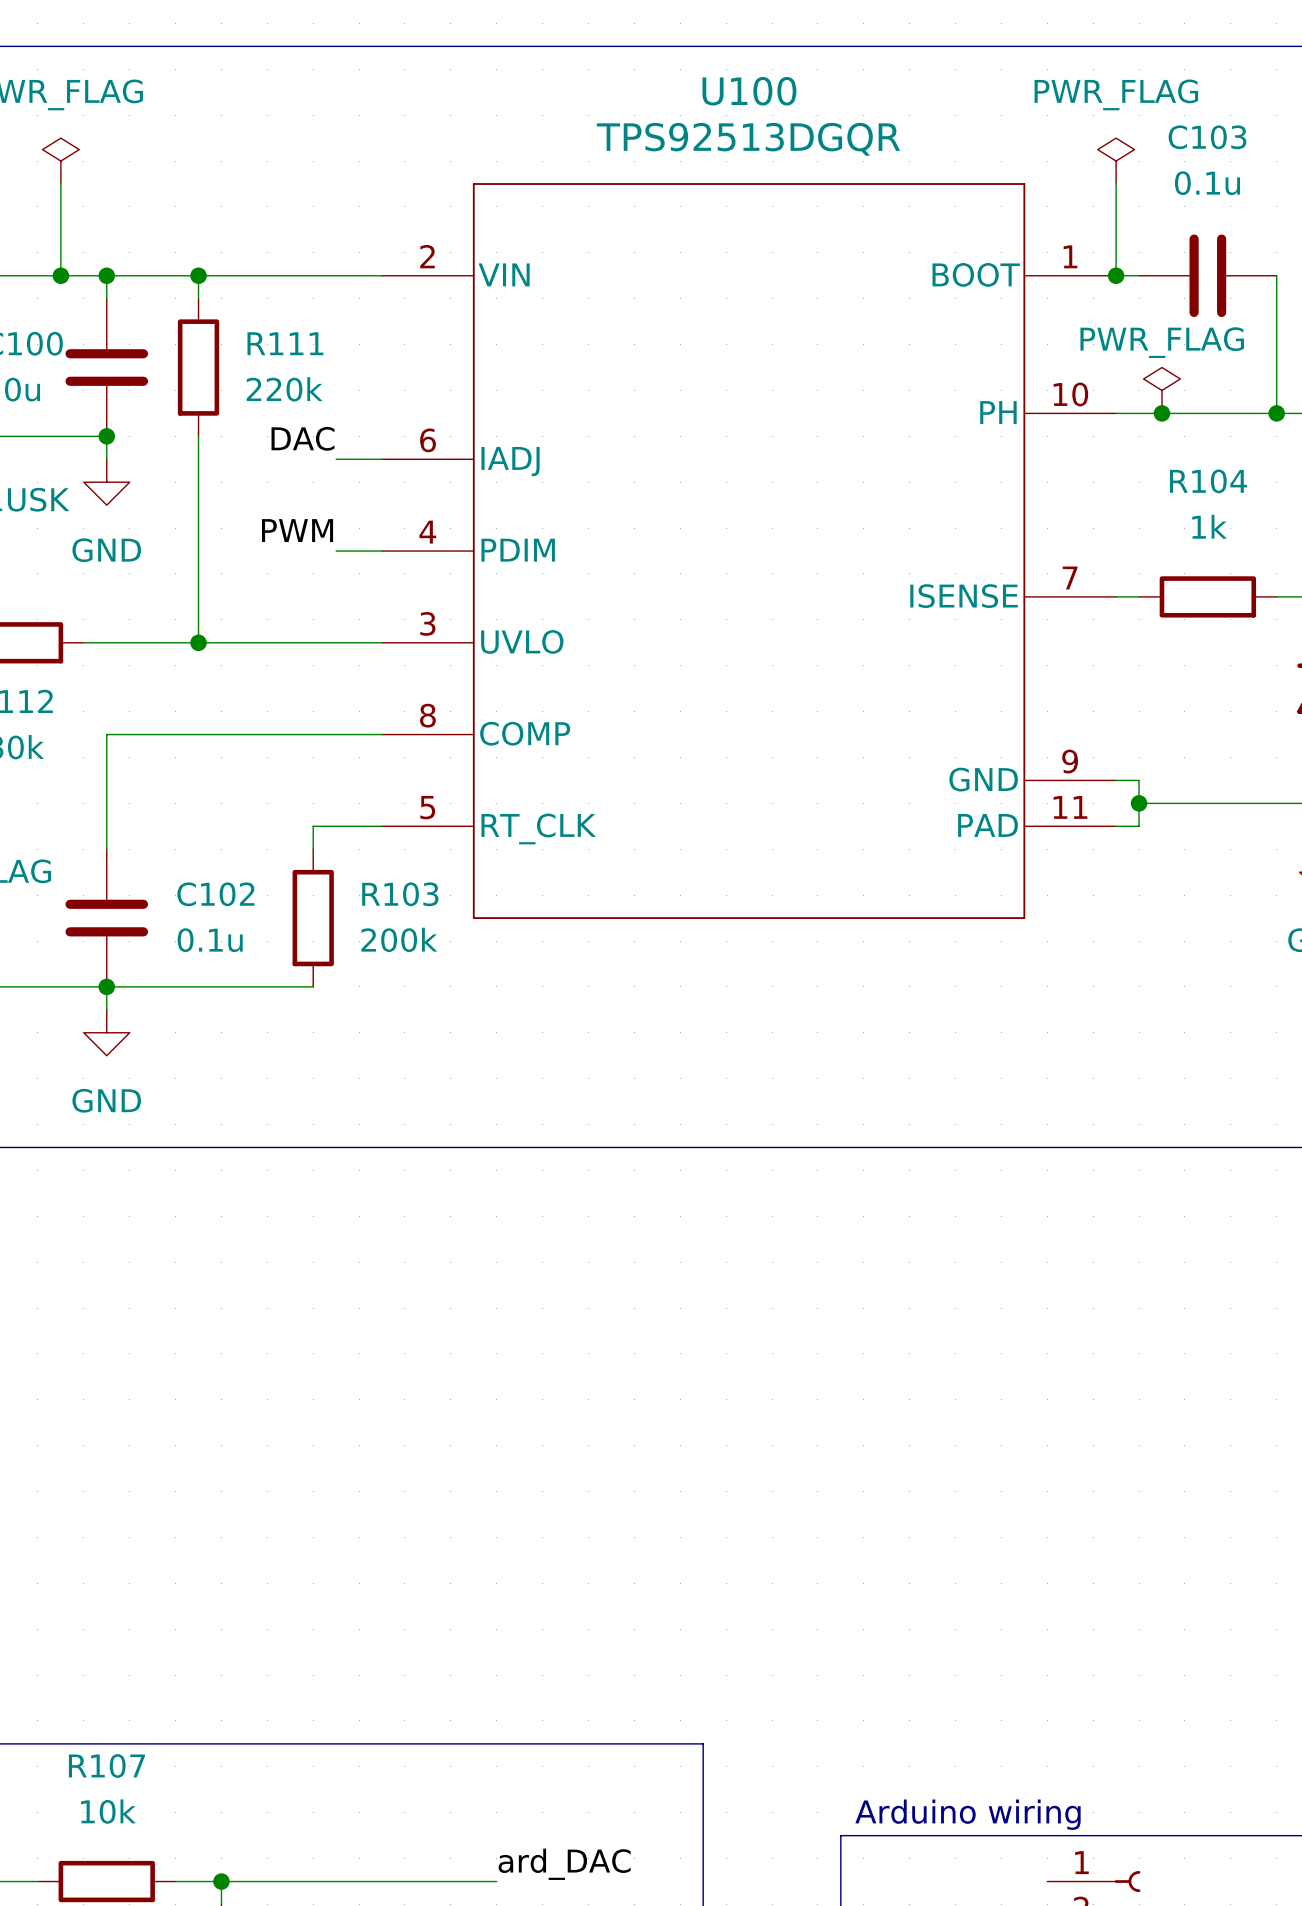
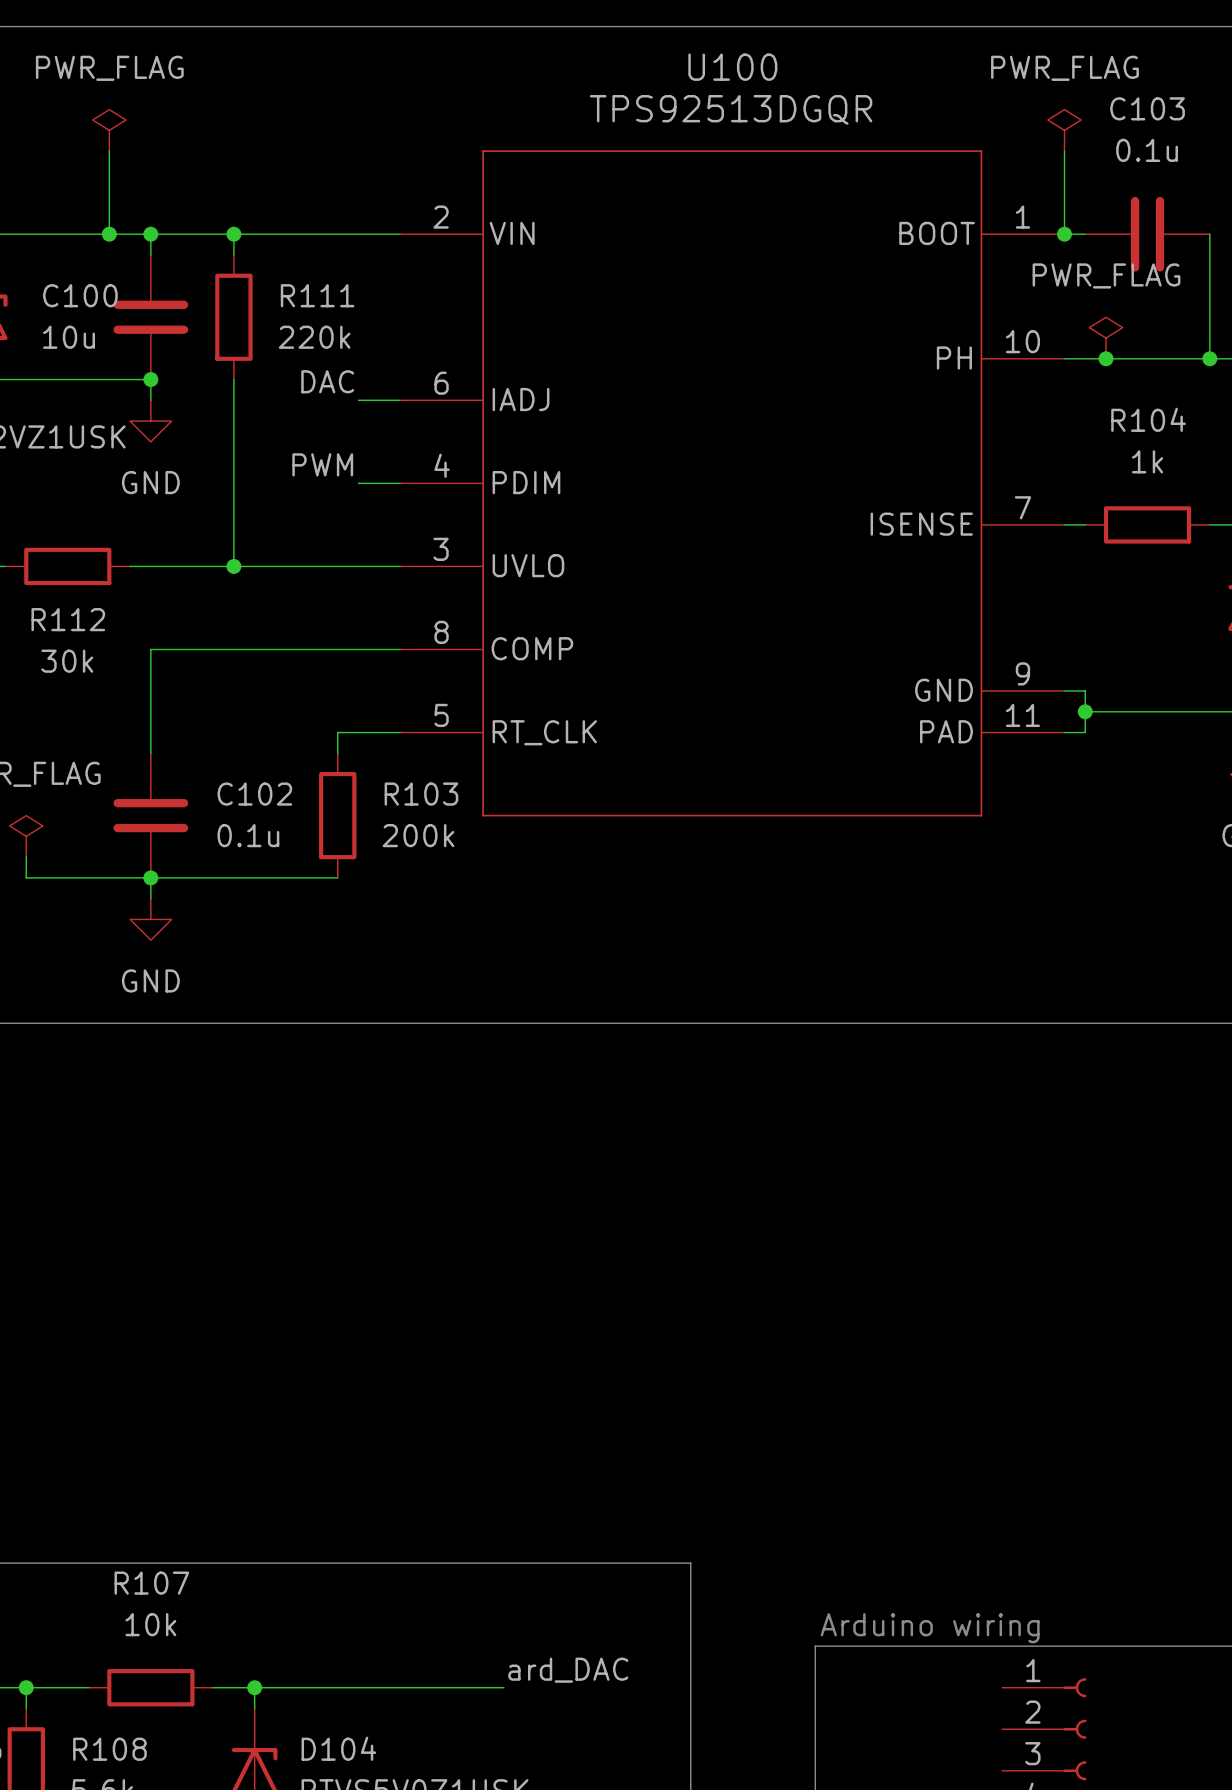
power symbol text position: PWR_FLAG (1162, 342) -> PWR_FLAG (1106, 275)

